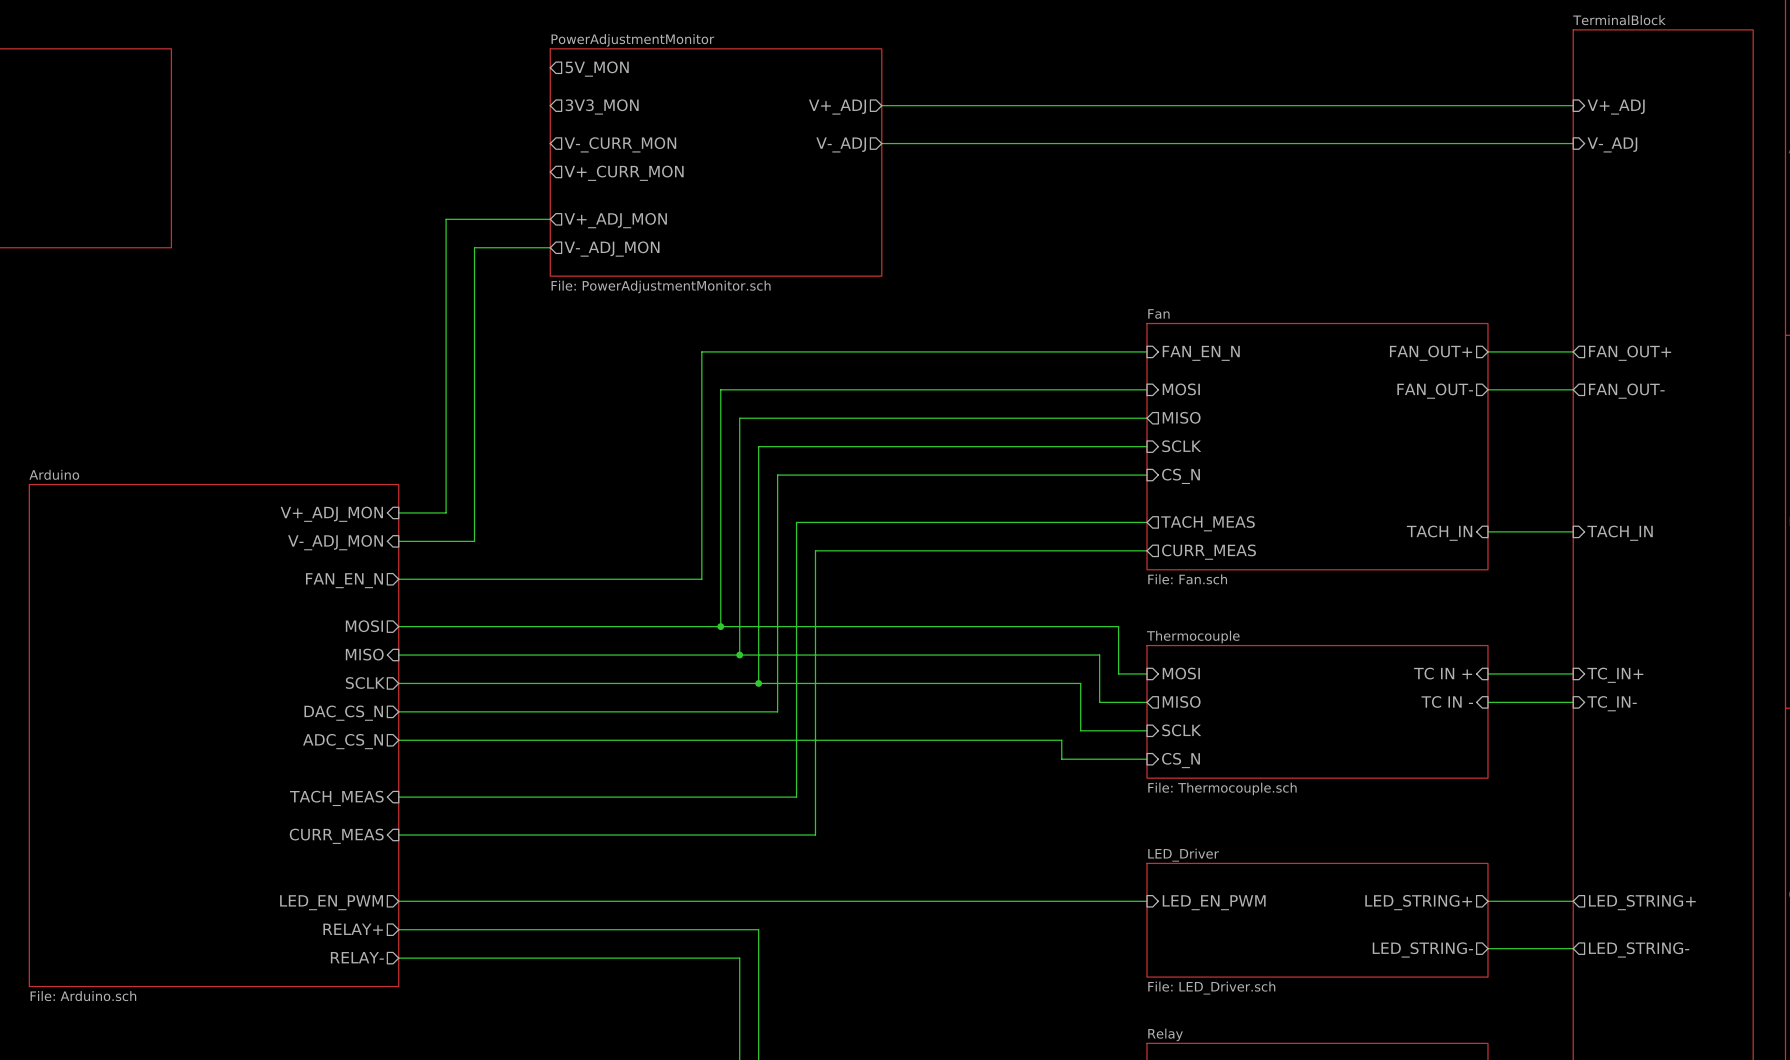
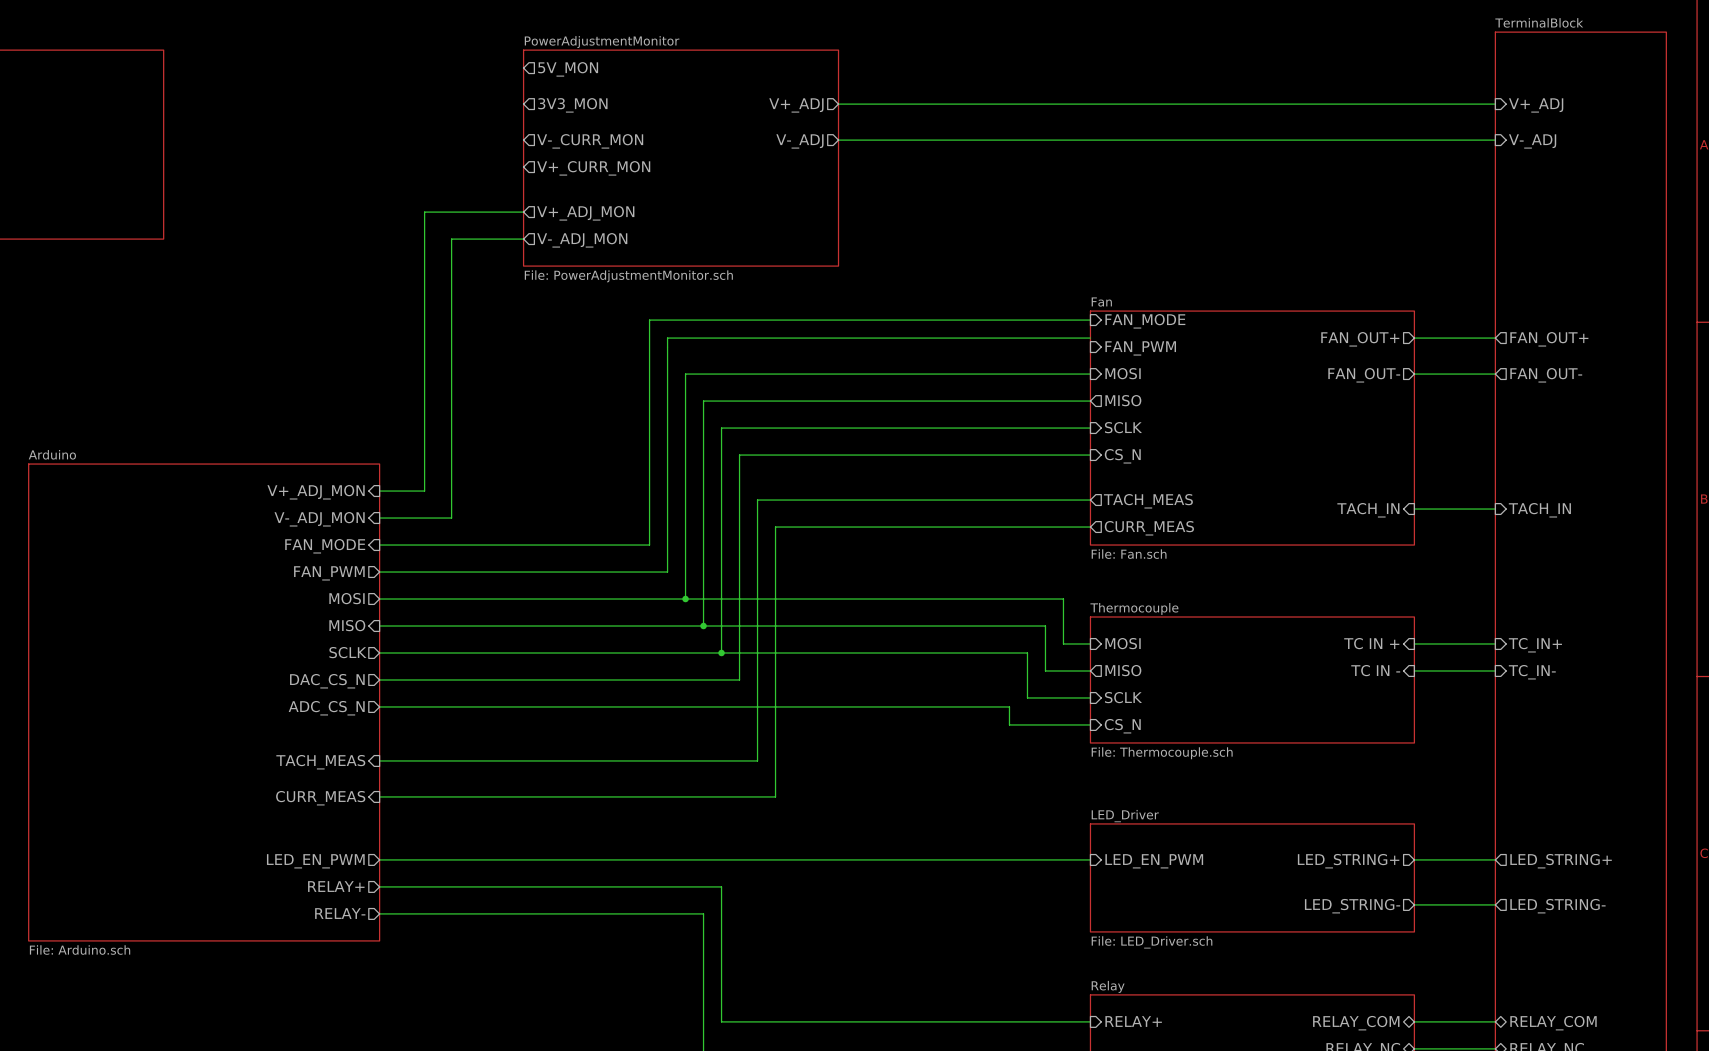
wire: none -> (1090, 320) (649, 320) (649, 545) (379, 545)
sheet pin: FAN_EN_N (1201, 353) -> FAN_MODE (1145, 321)
sheet pin: none -> FAN_PWM (1140, 348)
wire: (398, 579) (701, 579) -> (379, 572) (667, 572) (667, 554)
sheet pin shape: output (344, 580) -> input (325, 546)
sheet pin: FAN_EN_N (344, 580) -> FAN_MODE (325, 546)
sheet pin: none -> FAN_PWM (329, 573)

